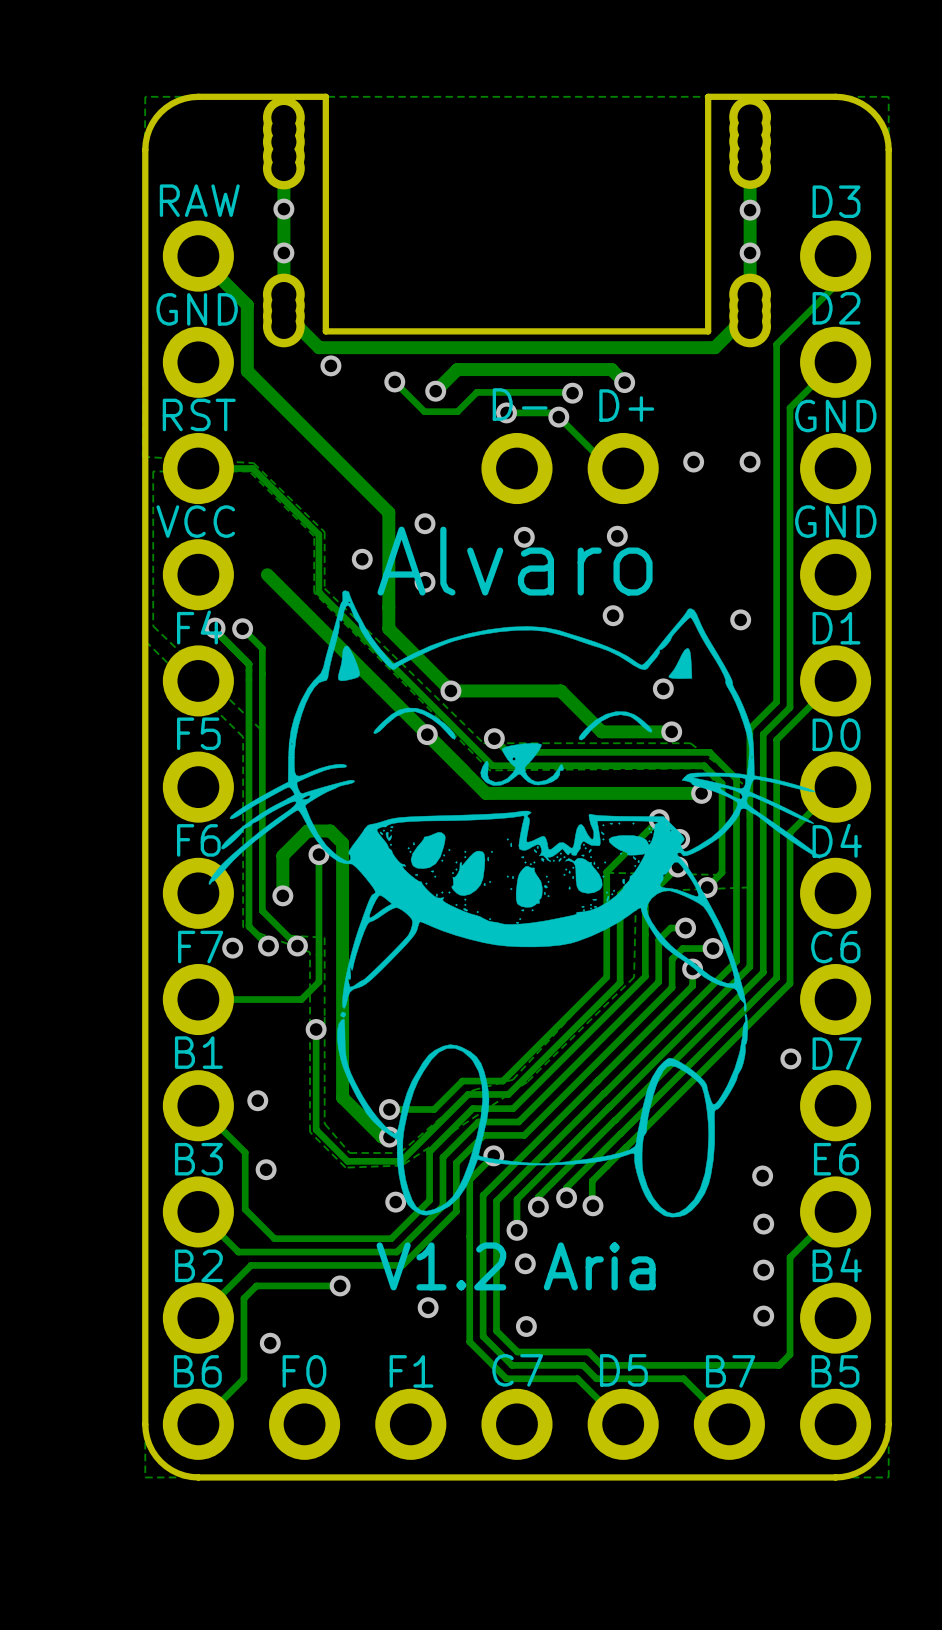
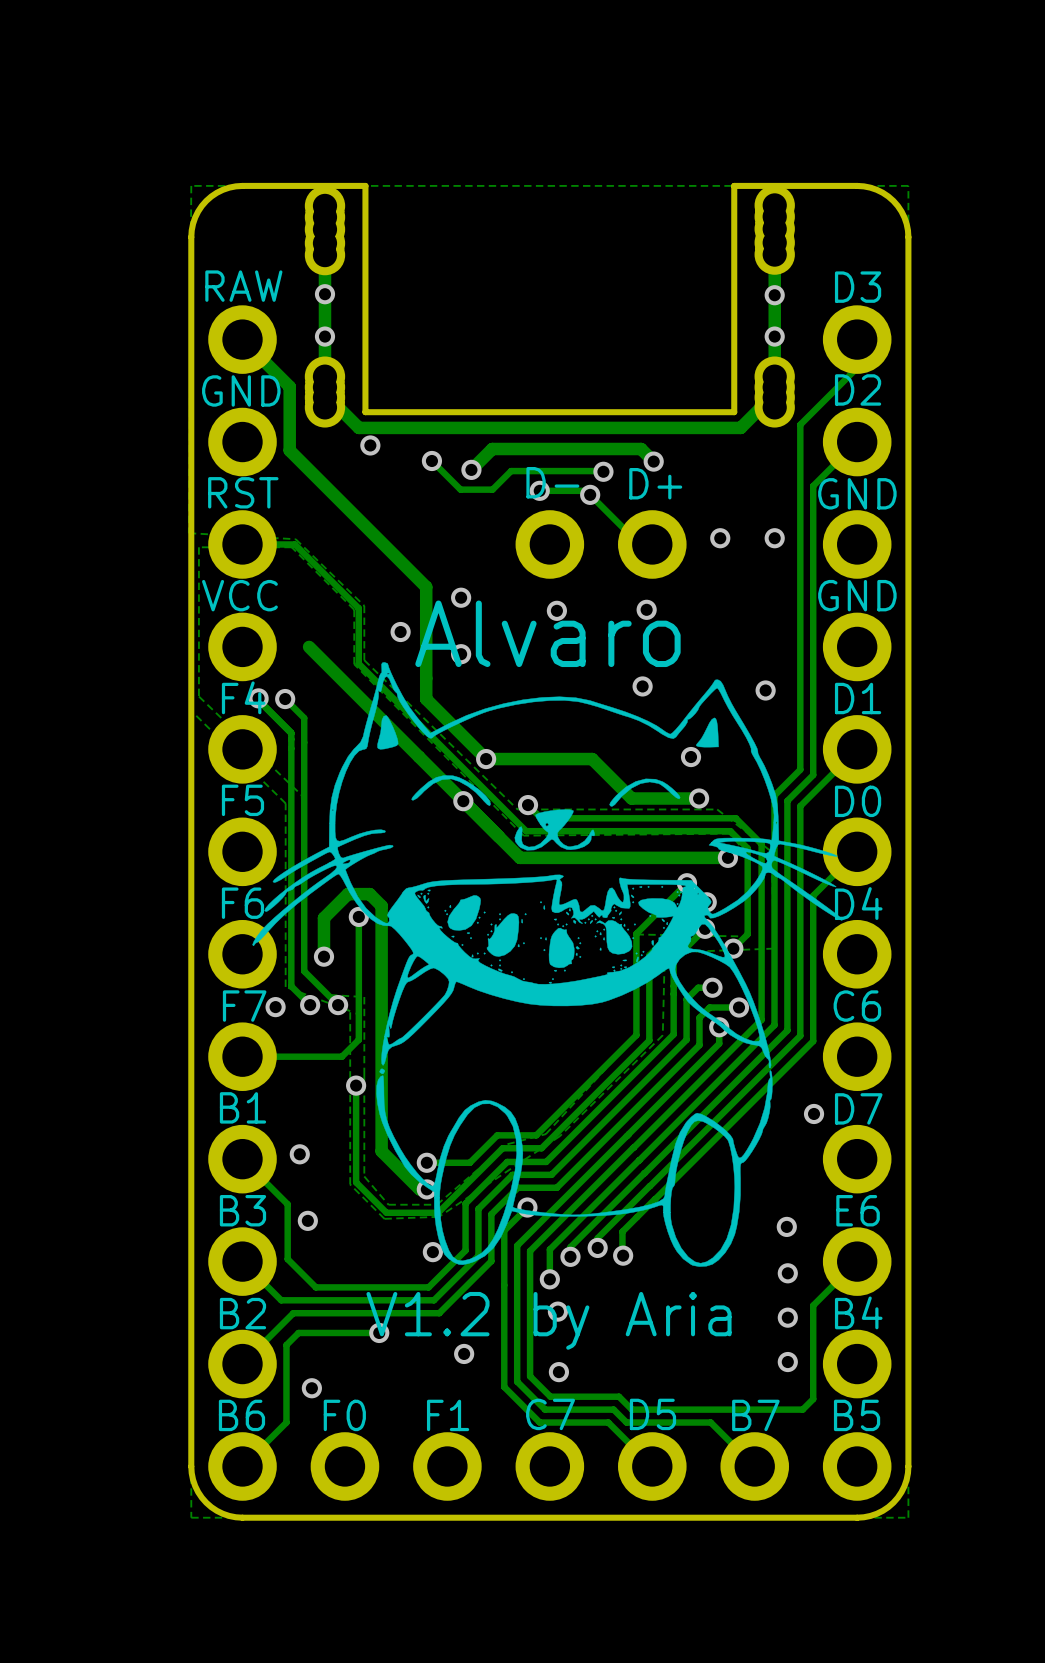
text: V1.2 Aria (516, 1266) -> V1.2 by Aria (548, 1320)

